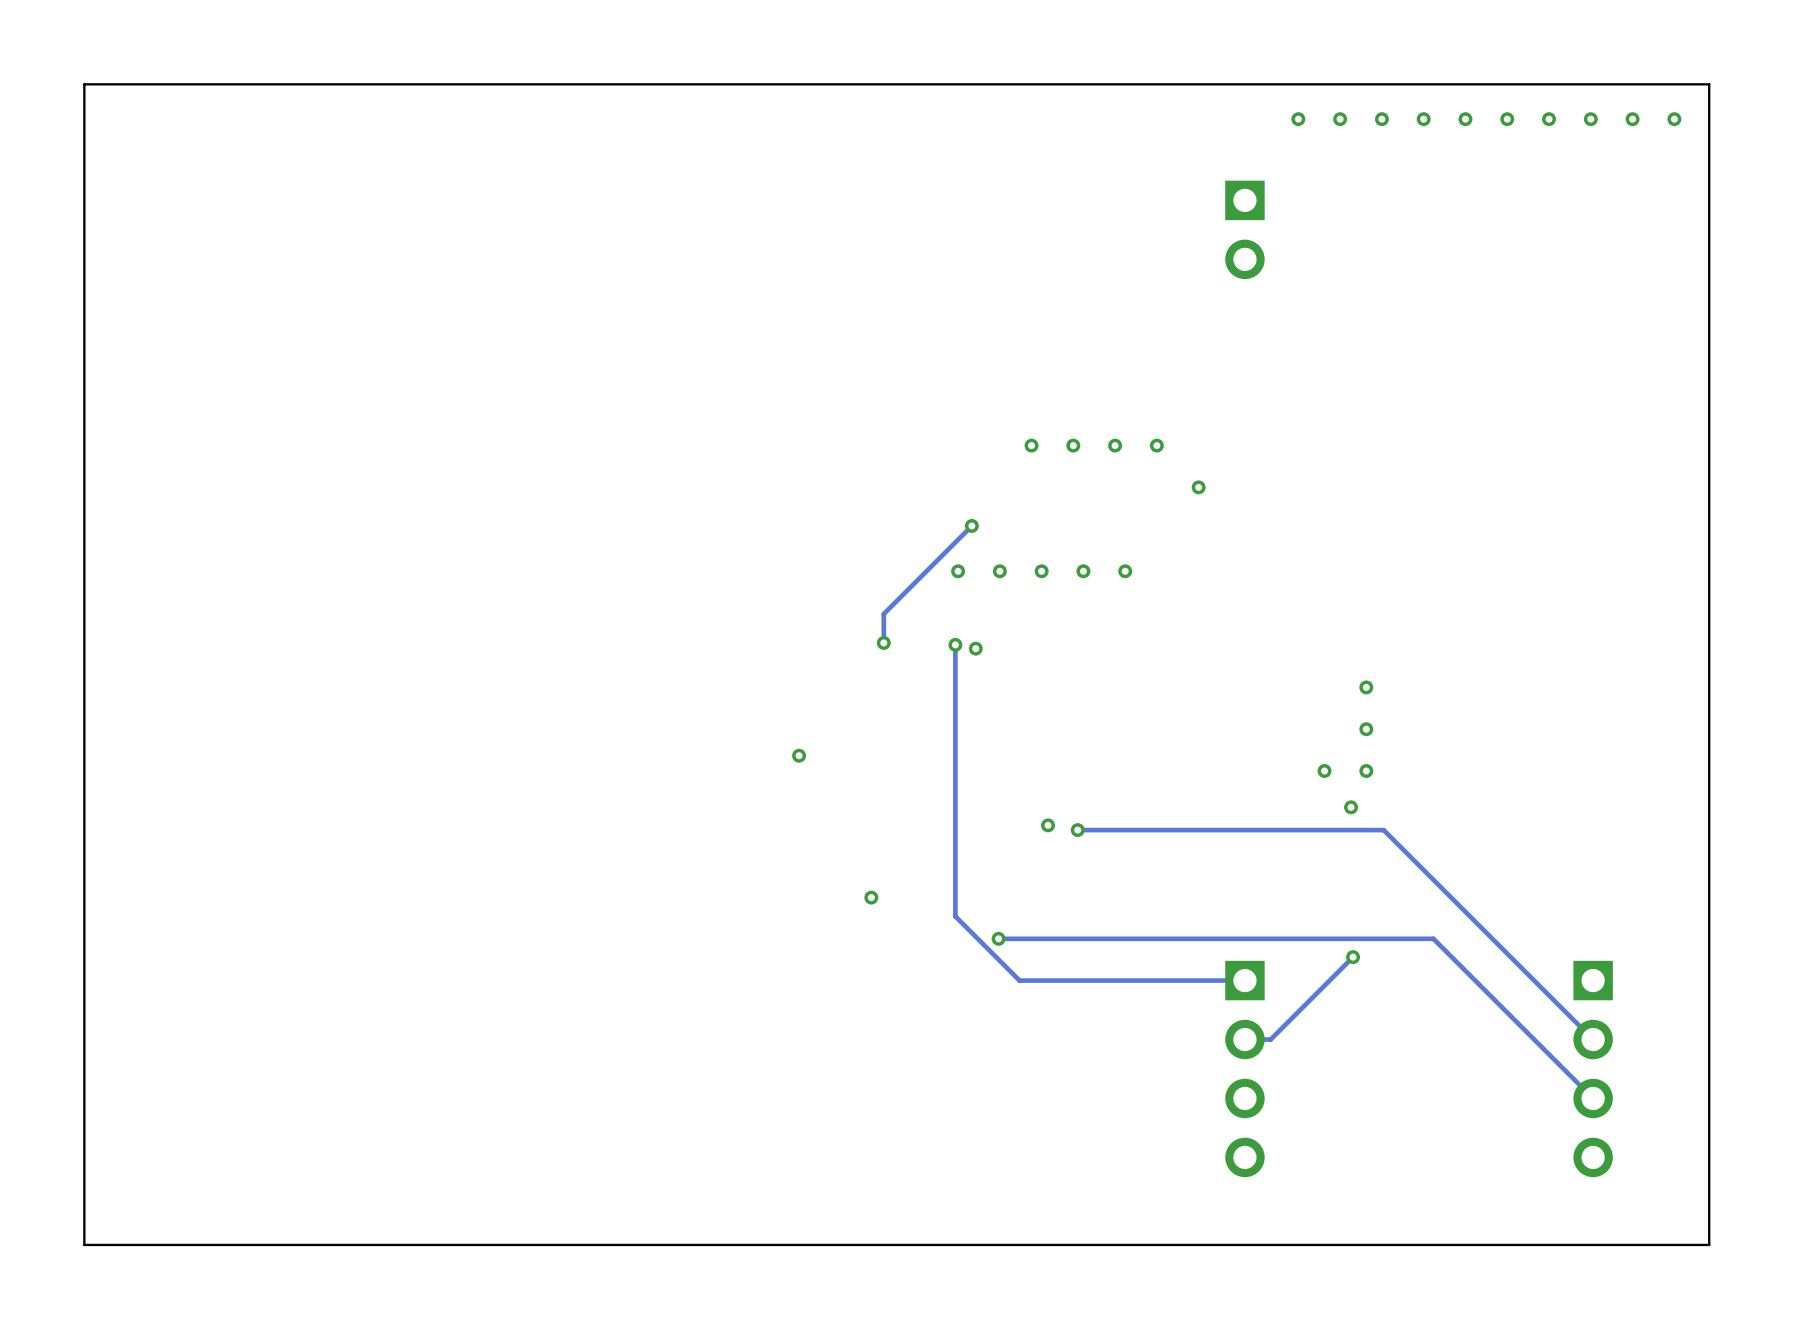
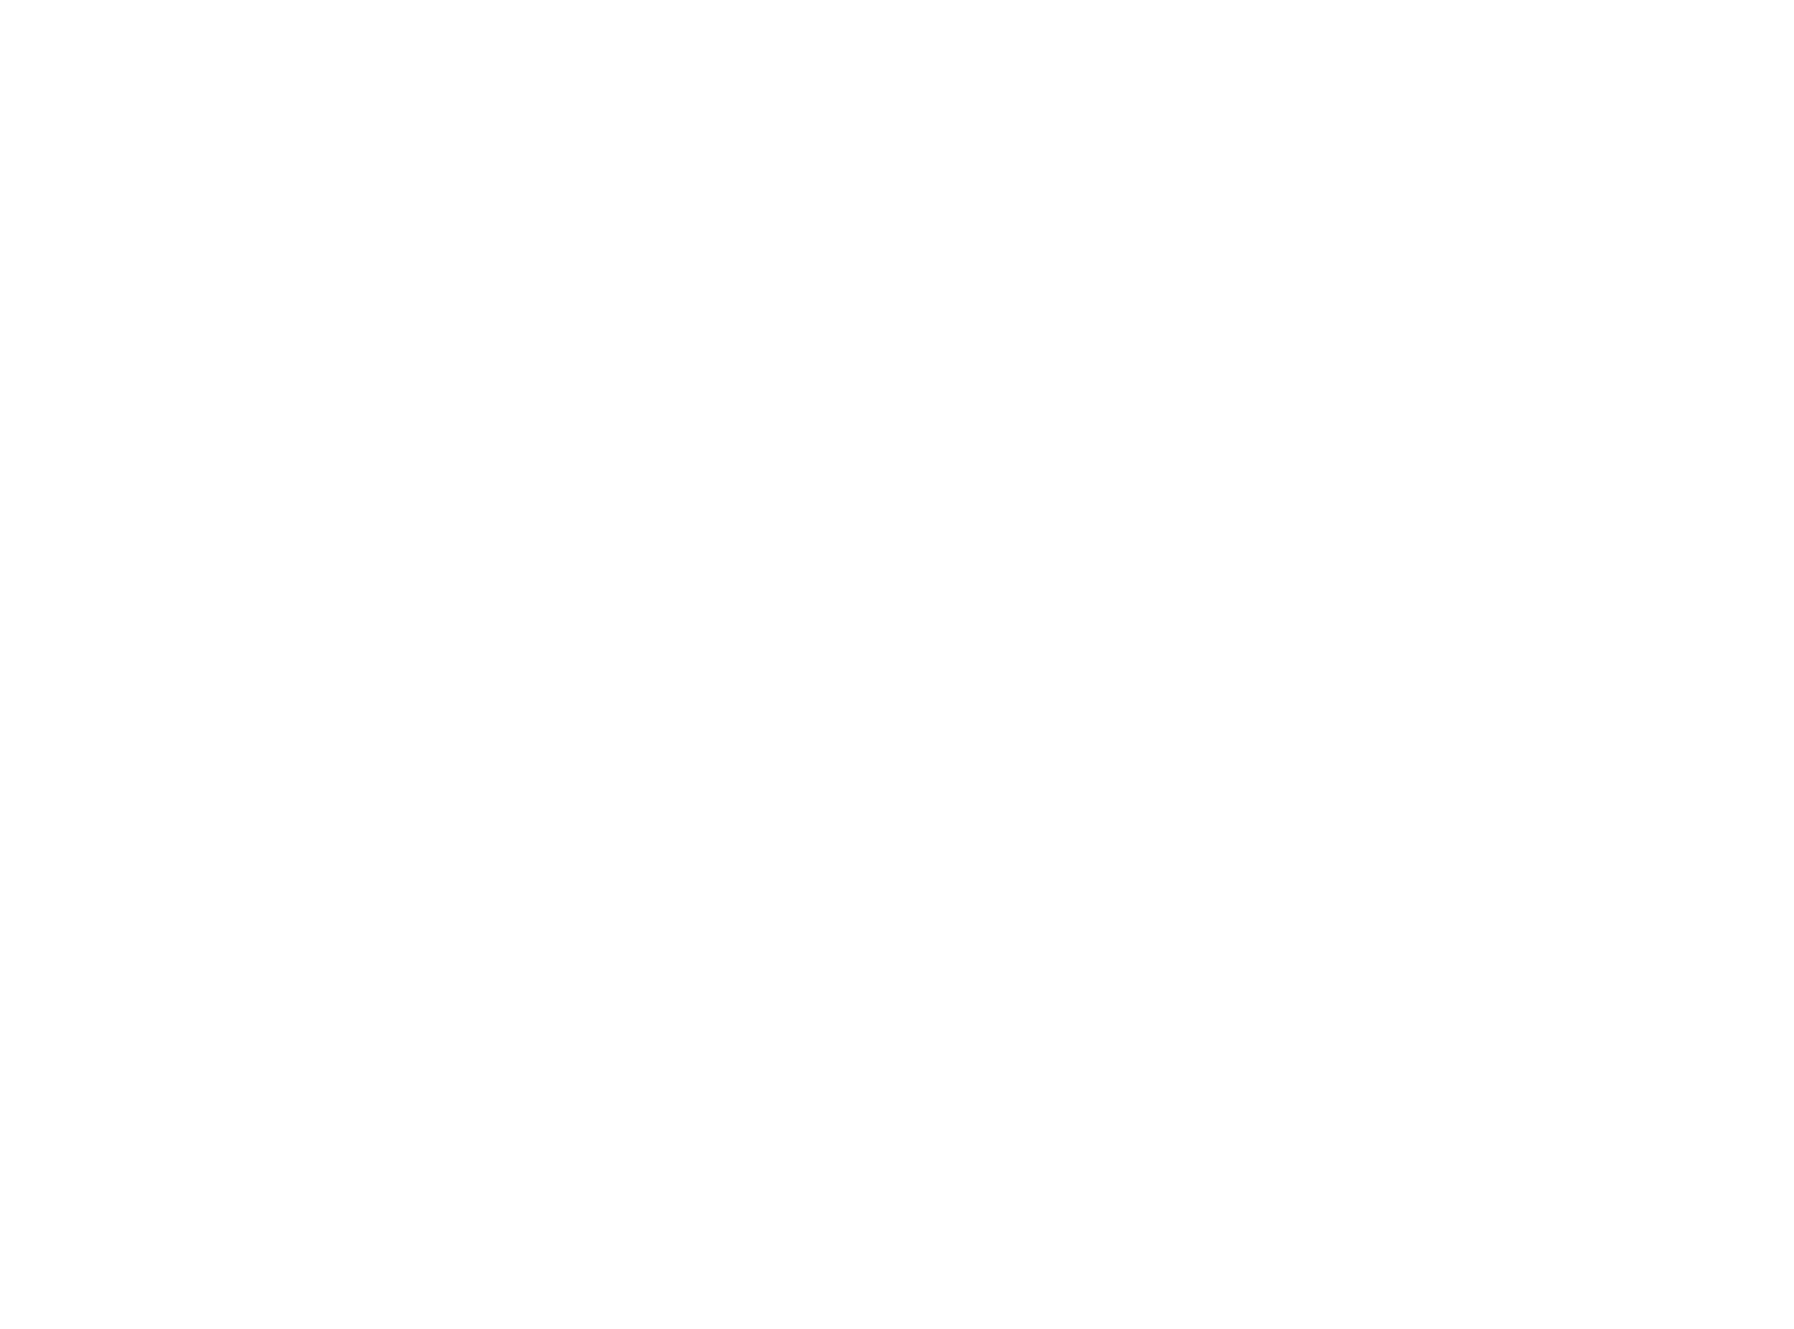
board edge: (1709, 84) (84, 84) (84, 1244) (1709, 1244) (1709, 84) -> none
via: (1298, 119) -> none
via: (1340, 119) -> none
via: (1381, 119) -> none
via: (1423, 119) -> none
via: (1465, 119) -> none
via: (1507, 119) -> none
via: (1549, 119) -> none
via: (1590, 119) -> none
via: (1632, 119) -> none
via: (1674, 119) -> none
part: (1244, 229) -> none
via: (1031, 445) -> none
via: (1073, 445) -> none
via: (1115, 445) -> none
via: (1156, 445) -> none
via: (1198, 487) -> none
track: (971, 525) (883, 614) (883, 642) -> none
via: (971, 525) -> none
via: (958, 571) -> none
via: (999, 571) -> none
via: (1041, 571) -> none
via: (1083, 571) -> none
via: (1125, 571) -> none
via: (883, 642) -> none
track: (955, 644) (955, 916) (1019, 980) (1244, 980) -> none
via: (955, 644) -> none
via: (975, 648) -> none
via: (1366, 687) -> none
via: (1366, 729) -> none
via: (799, 755) -> none
via: (1324, 770) -> none
via: (1366, 770) -> none
via: (1351, 807) -> none
via: (1048, 825) -> none
track: (1077, 830) (1383, 830) (1593, 1039) -> none
via: (1077, 830) -> none
via: (871, 897) -> none
track: (998, 938) (1433, 938) (1593, 1098) -> none
via: (998, 938) -> none
track: (1353, 957) (1270, 1039) (1244, 1039) -> none
via: (1353, 957) -> none
part: (1244, 1069) -> none
part: (1593, 1069) -> none

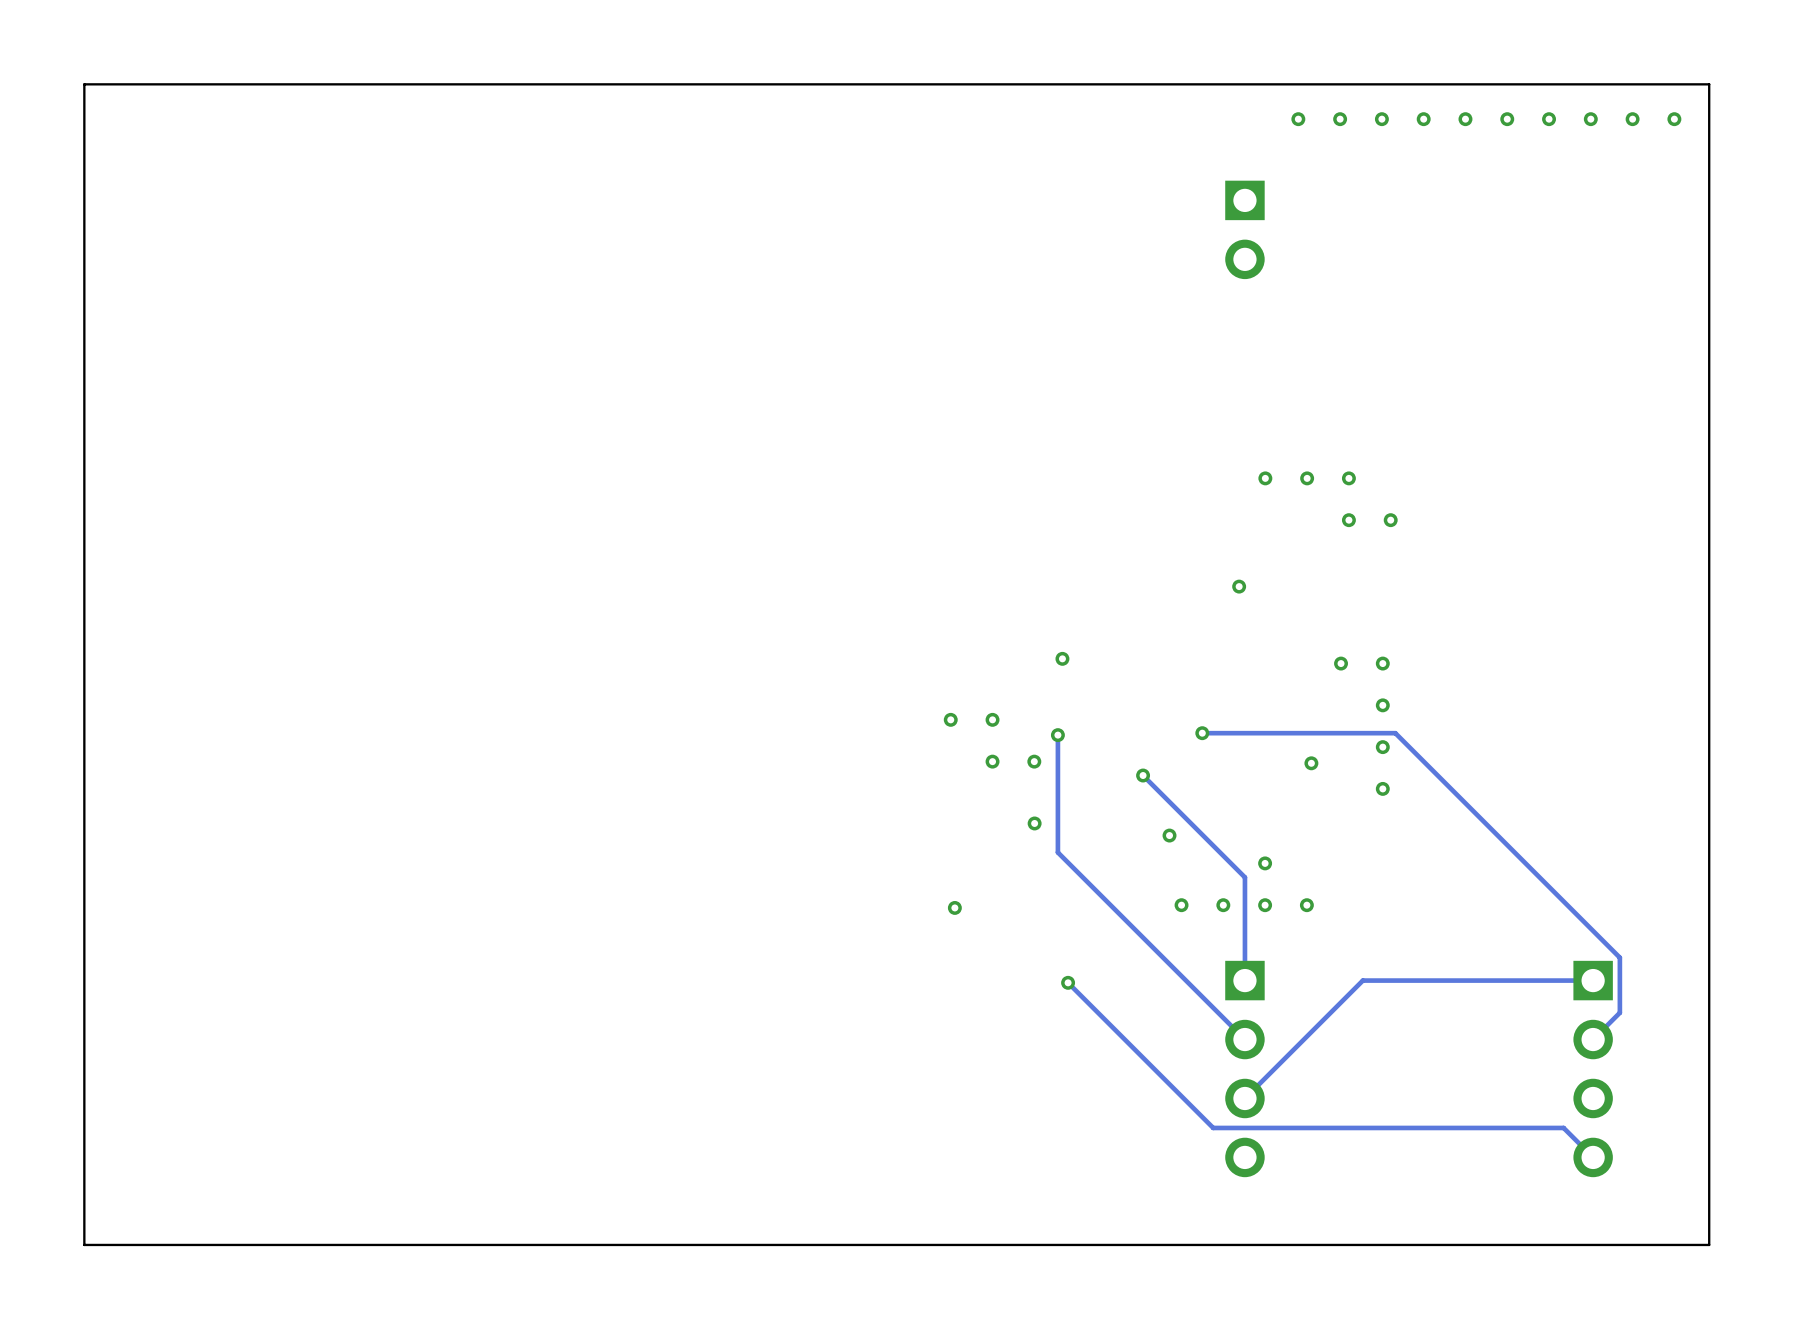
board edge: none -> (1709, 84) (84, 84) (84, 1244) (1709, 1244) (1709, 84)
via: none -> (1298, 119)
via: none -> (1340, 119)
via: none -> (1381, 119)
via: none -> (1423, 119)
via: none -> (1465, 119)
via: none -> (1507, 119)
via: none -> (1549, 119)
via: none -> (1590, 119)
via: none -> (1632, 119)
via: none -> (1674, 119)
part: none -> (1244, 229)
via: none -> (1265, 478)
via: none -> (1307, 478)
via: none -> (1348, 478)
via: none -> (1348, 520)
via: none -> (1390, 520)
via: none -> (1239, 586)
via: none -> (1062, 658)
via: none -> (1341, 663)
via: none -> (1382, 663)
via: none -> (1382, 705)
via: none -> (950, 719)
via: none -> (992, 719)
track: none -> (1202, 733) (1395, 733) (1619, 957) (1619, 1012) (1593, 1039)
via: none -> (1202, 733)
track: none -> (1057, 735) (1057, 852) (1244, 1039)
via: none -> (1057, 735)
via: none -> (1382, 747)
via: none -> (992, 761)
via: none -> (1034, 761)
via: none -> (1311, 763)
track: none -> (1143, 775) (1244, 877) (1244, 980)
via: none -> (1143, 775)
via: none -> (1382, 788)
via: none -> (1034, 823)
via: none -> (1169, 835)
via: none -> (1265, 863)
via: none -> (1181, 905)
via: none -> (1223, 905)
via: none -> (1265, 905)
via: none -> (1306, 905)
via: none -> (954, 907)
track: none -> (1593, 980) (1362, 980) (1244, 1098)
track: none -> (1068, 982) (1213, 1127) (1563, 1127) (1593, 1157)
via: none -> (1068, 982)
part: none -> (1244, 1069)
part: none -> (1593, 1069)

